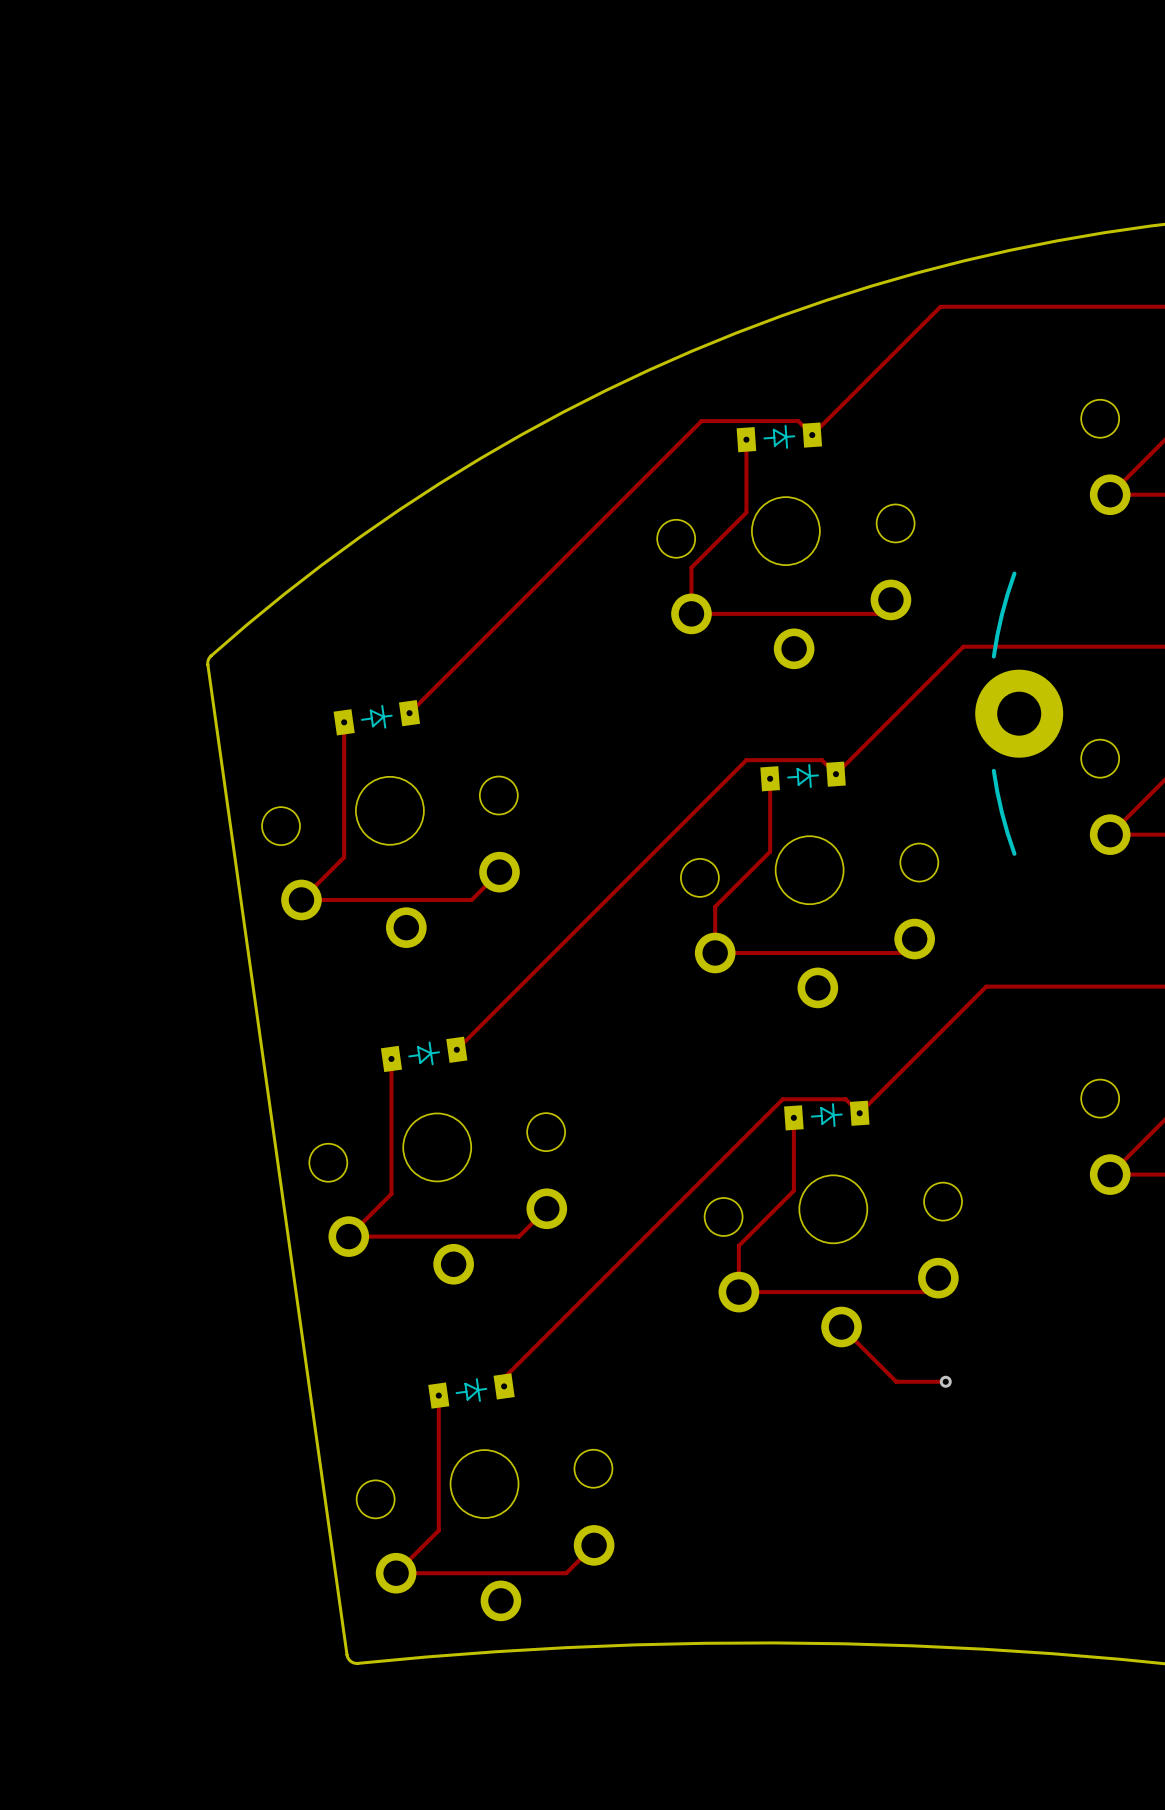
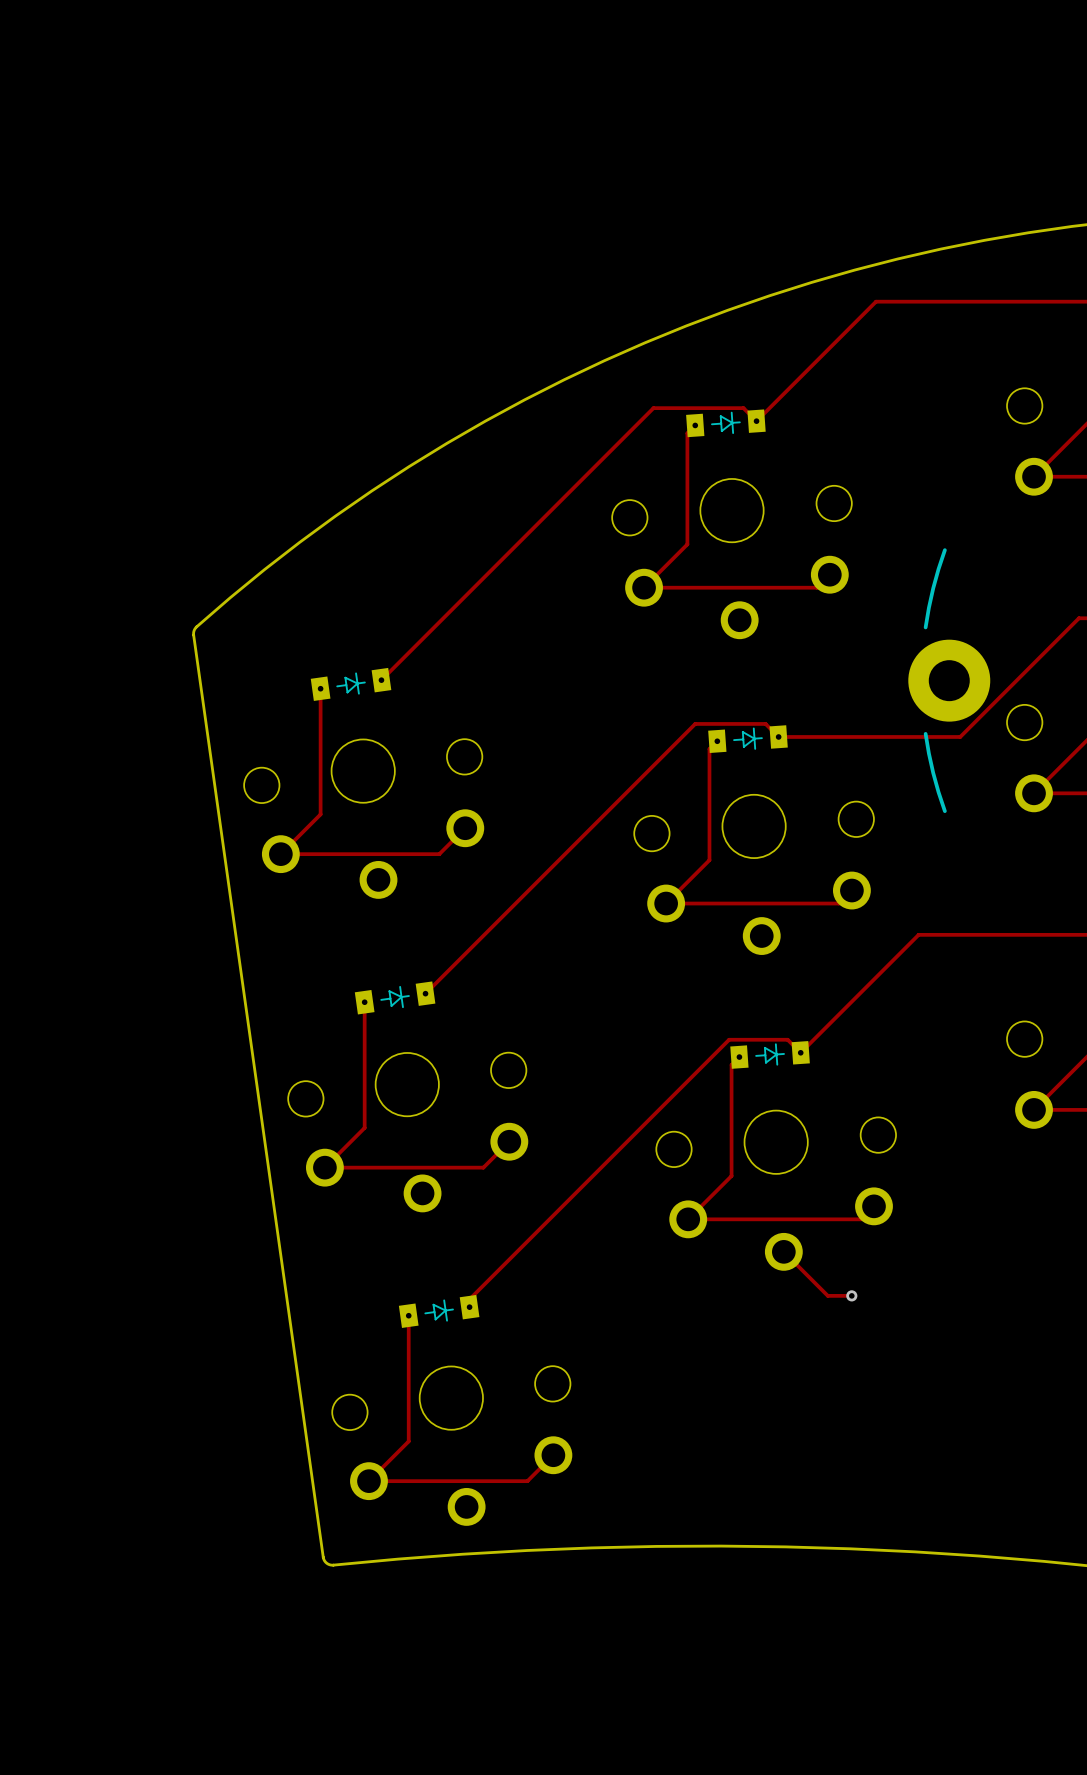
track: (746, 439) (746, 512) (691, 567) (691, 613) -> (695, 425) (687, 433) (687, 544) (644, 587)
track: (1158, 646) (963, 646) (835, 774) -> (1078, 618) (960, 736) (778, 736)
track: (770, 778) (770, 851) (715, 906) (715, 952) -> (717, 741) (709, 749) (709, 860) (666, 903)
track: (793, 1117) (793, 1190) (738, 1245) (738, 1292) -> (739, 1057) (731, 1064) (731, 1175) (688, 1219)
track: (888, 1374) (896, 1381) (945, 1381) -> (827, 1295) (851, 1295)
via position: (945, 1381) -> (851, 1295)

